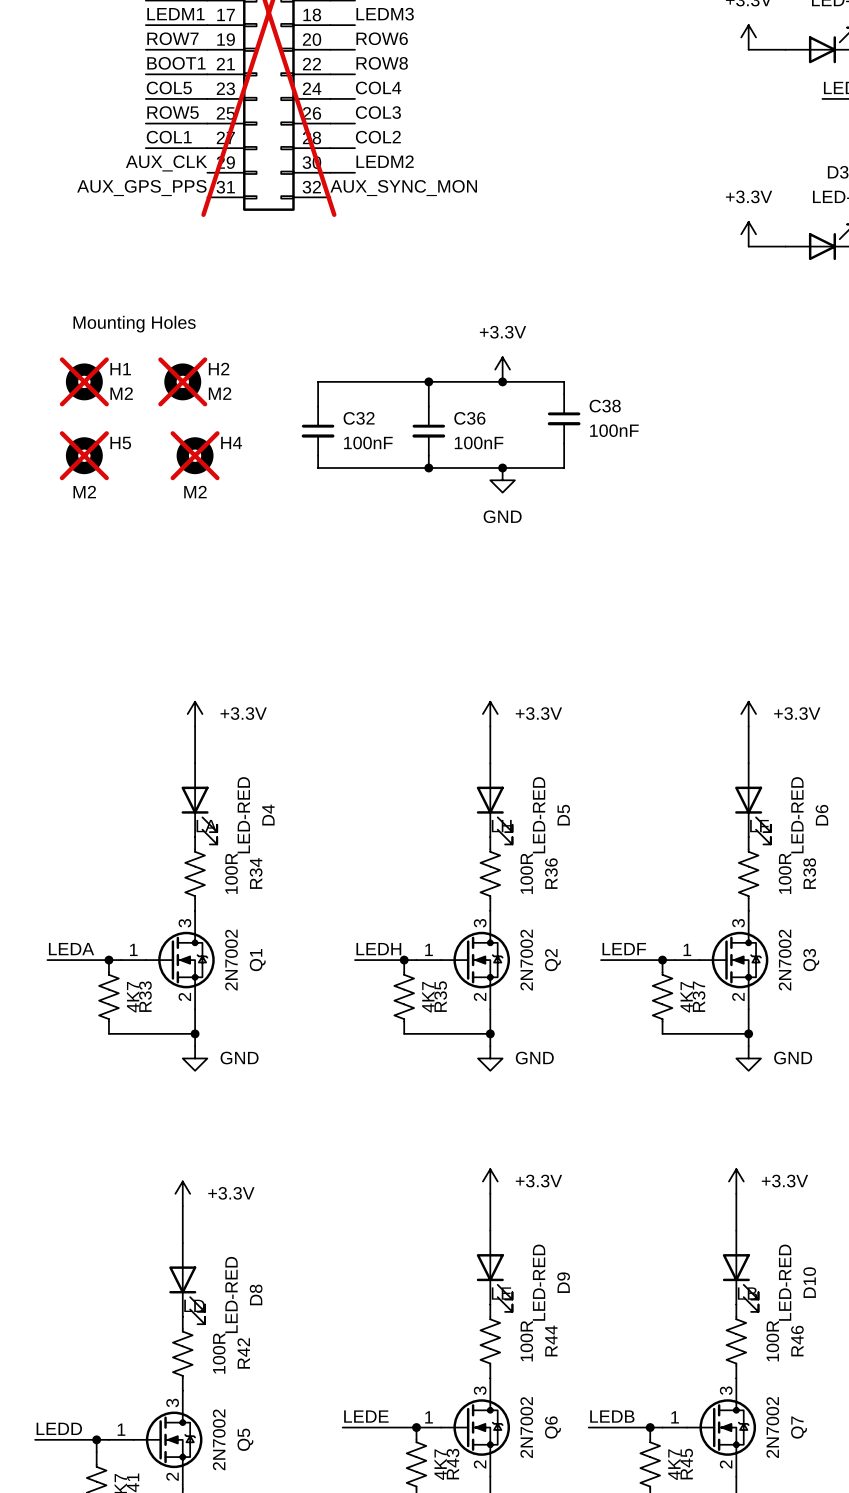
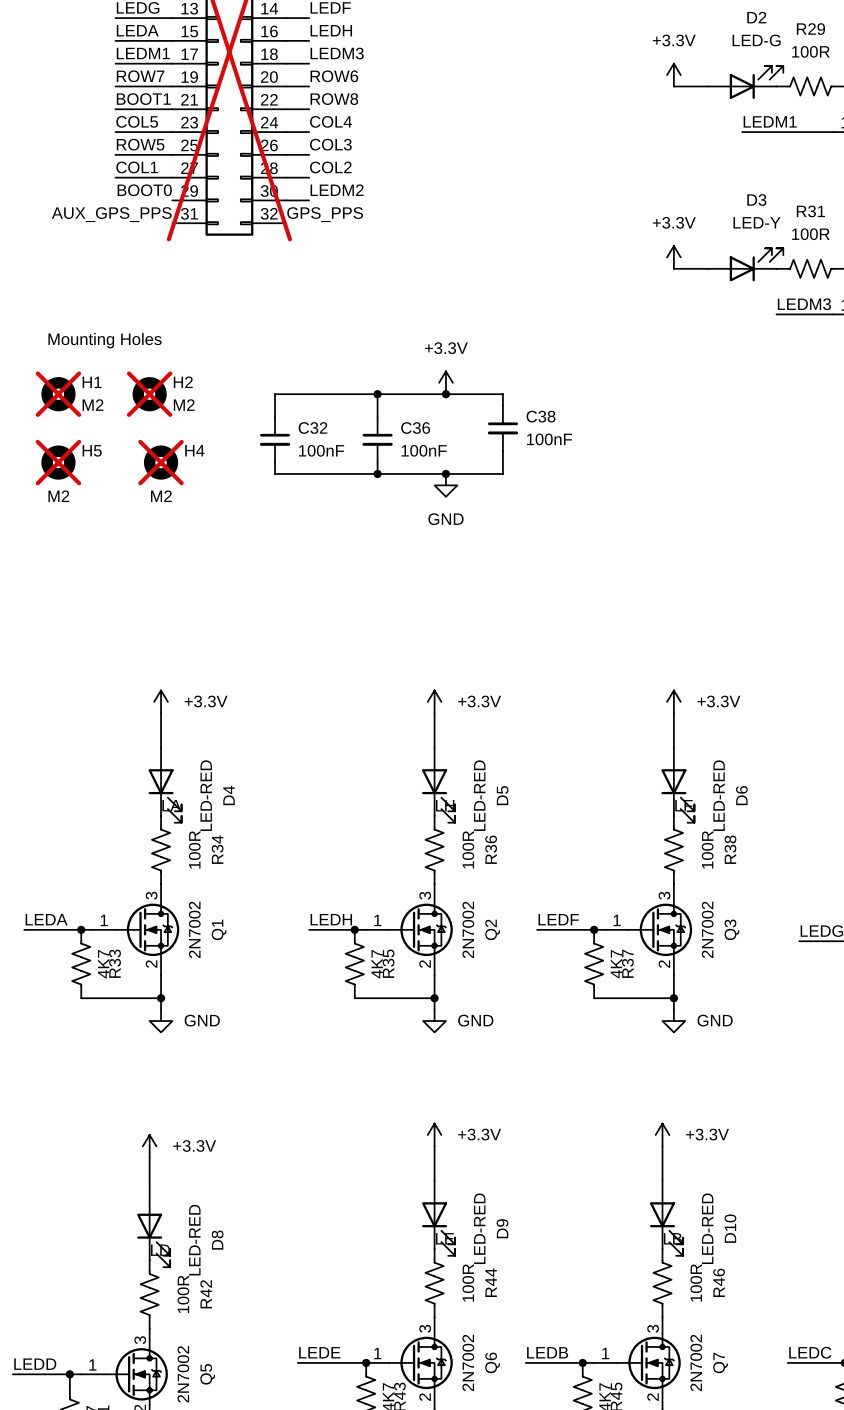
label: AUX_CLK (166, 163) -> BOOT0 (144, 190)
label: AUX_SYNC_MON (403, 188) -> GPS_PPS (325, 214)

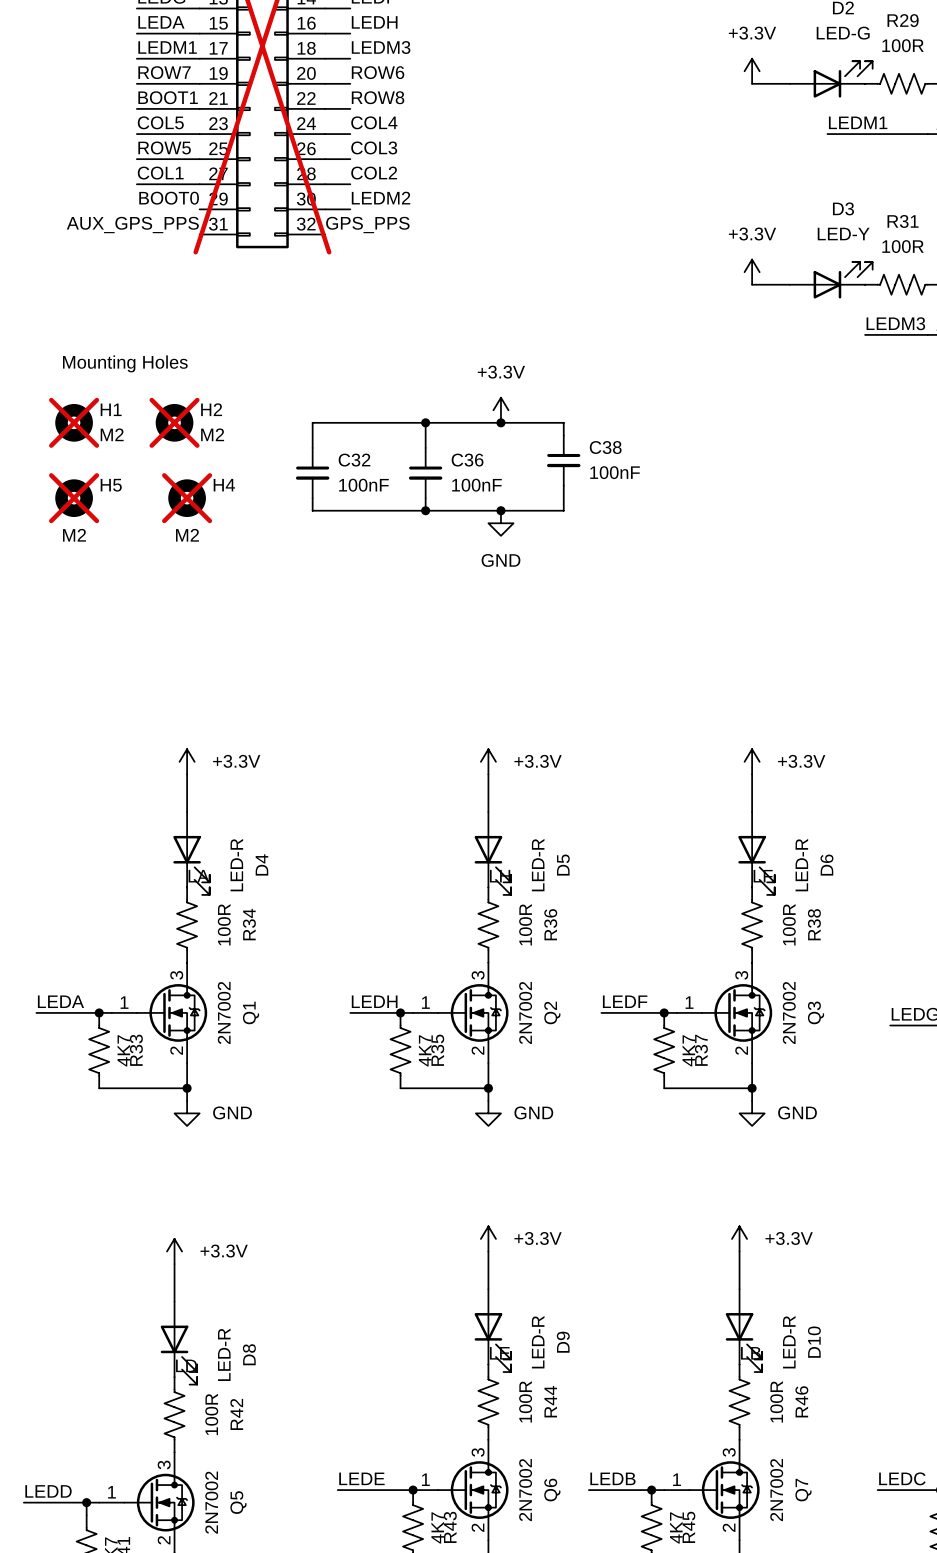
D4 value: LED-RED (206, 795) -> LED-R (236, 865)
D5 value: LED-RED (479, 795) -> LED-R (538, 865)
D6 value: LED-RED (719, 795) -> LED-R (801, 865)
D9 value: LED-RED (479, 1228) -> LED-R (538, 1342)
D10 value: LED-RED (707, 1228) -> LED-R (789, 1342)
D8 value: LED-RED (194, 1240) -> LED-R (224, 1354)

